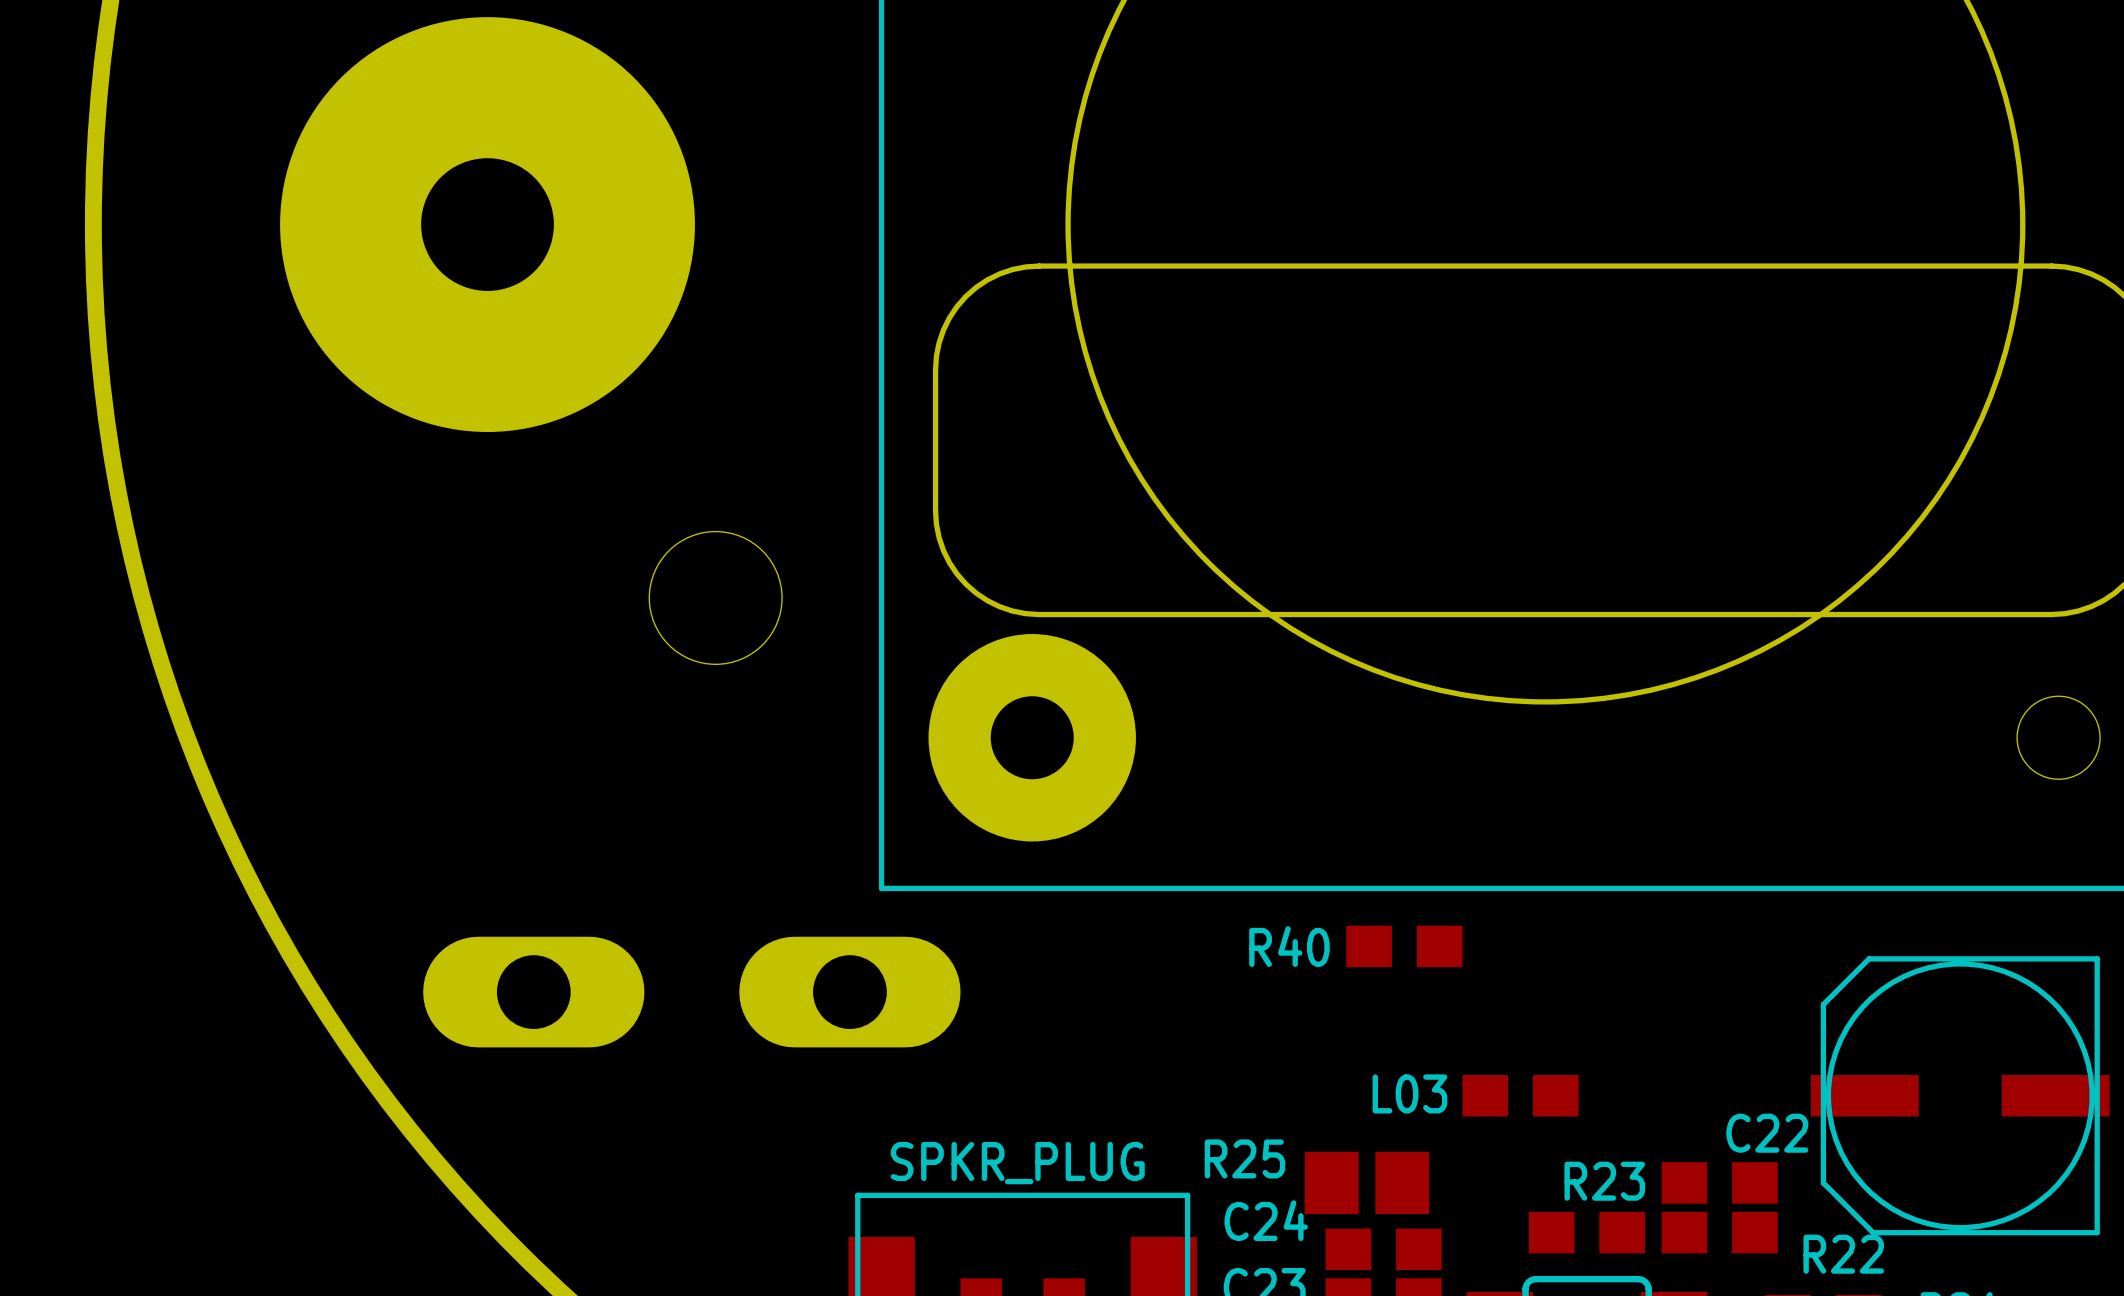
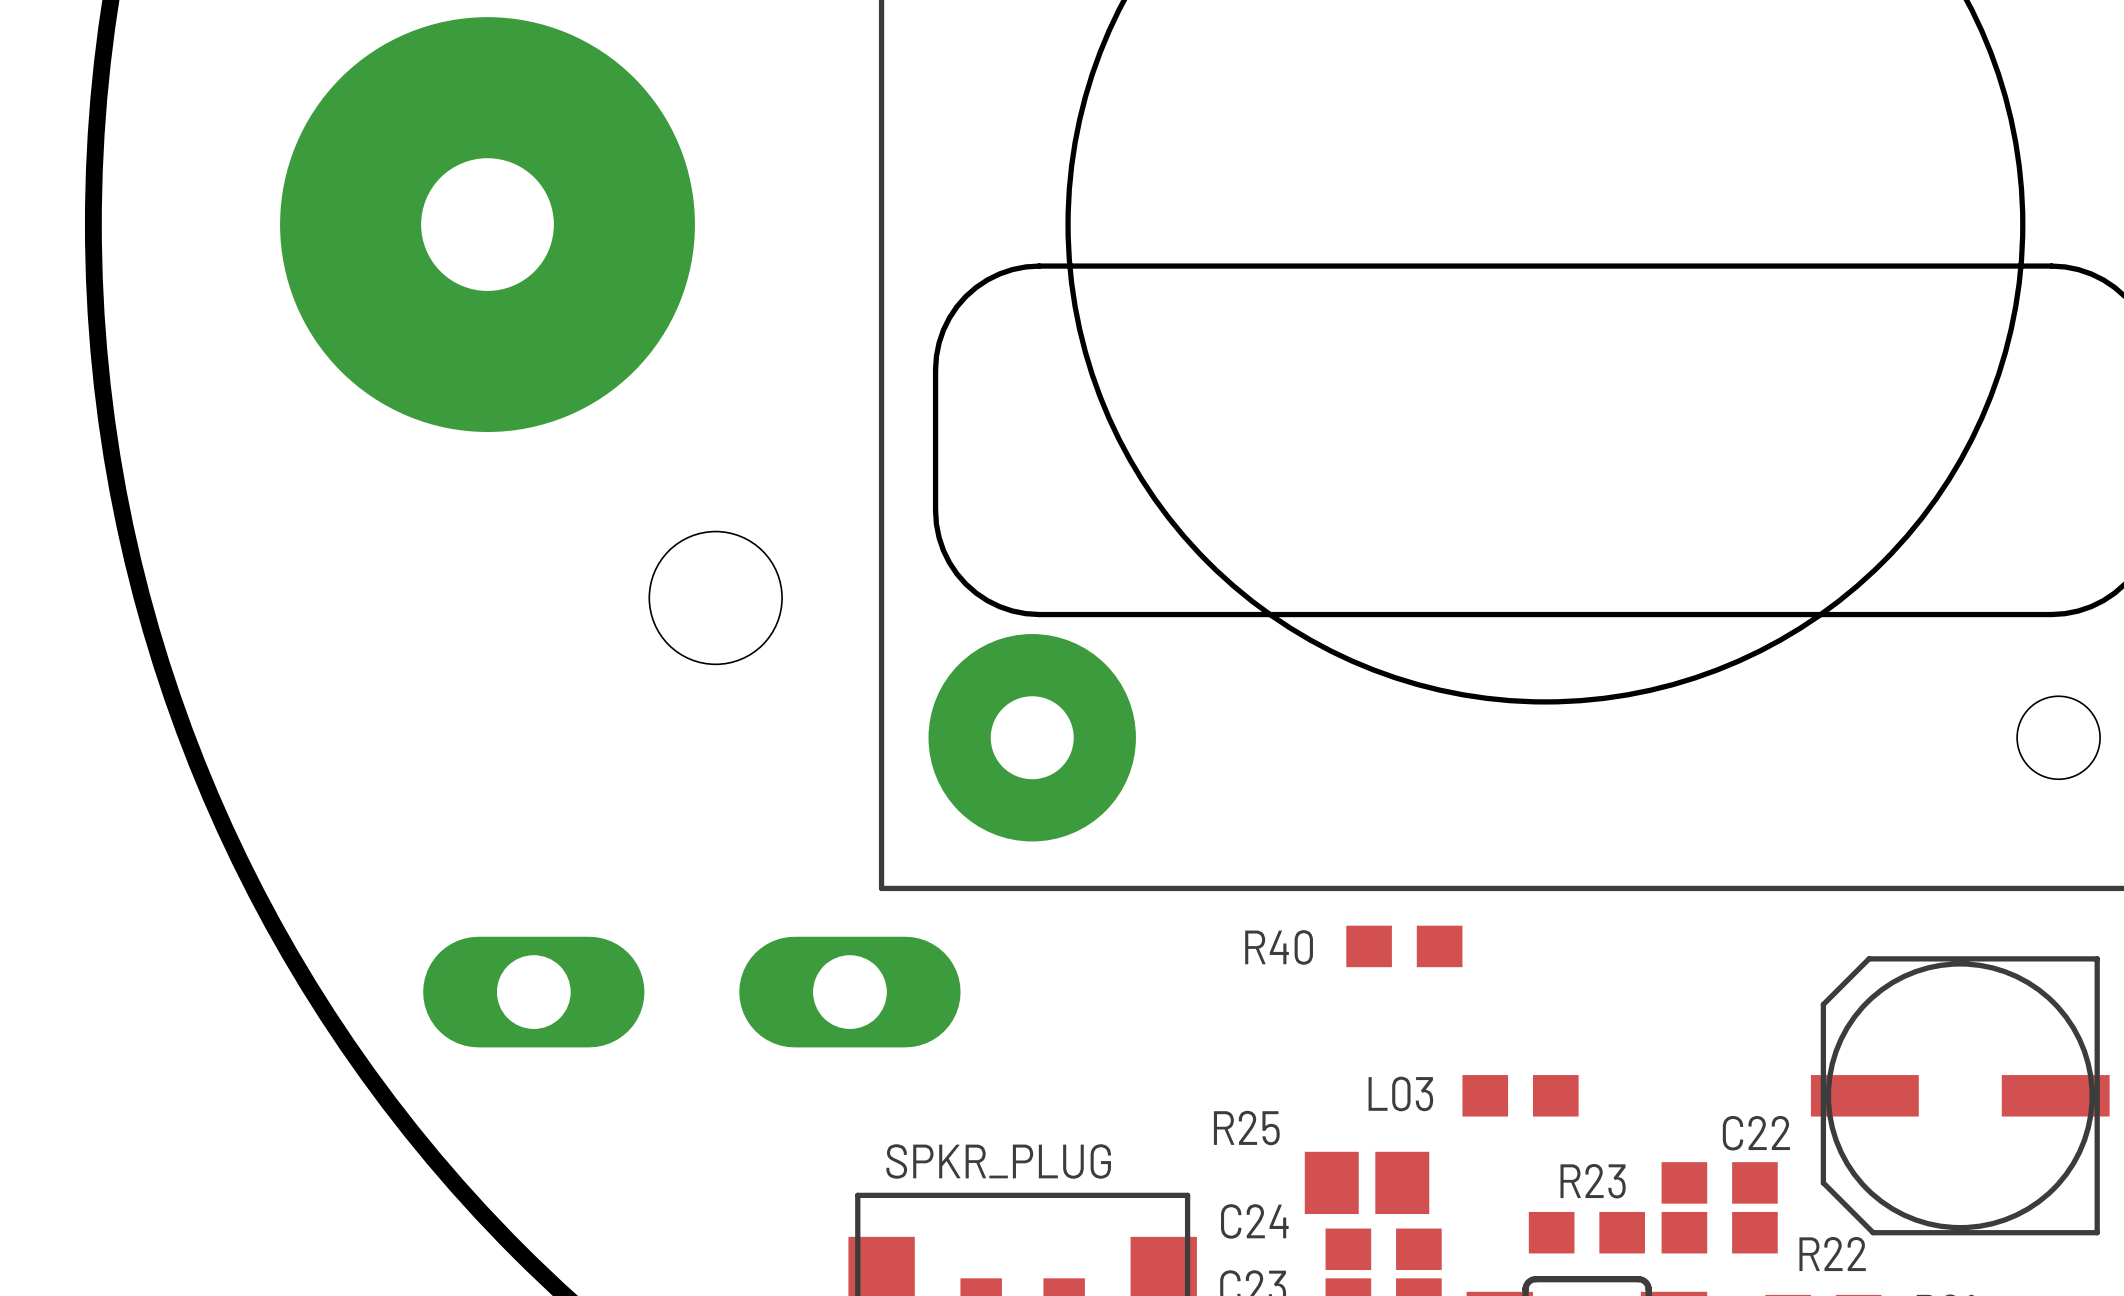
R25 name position: R25 (1244, 1158) -> R25 (1246, 1128)

